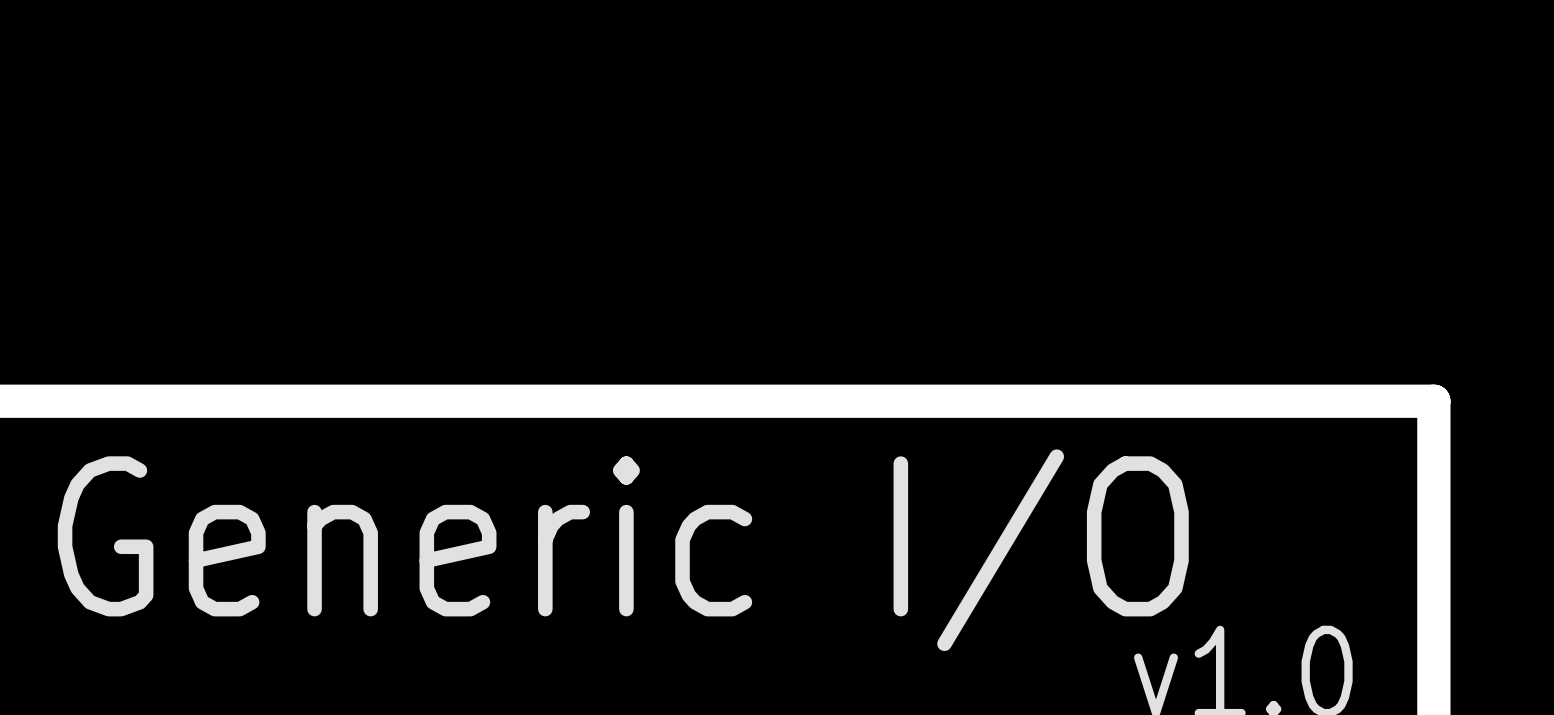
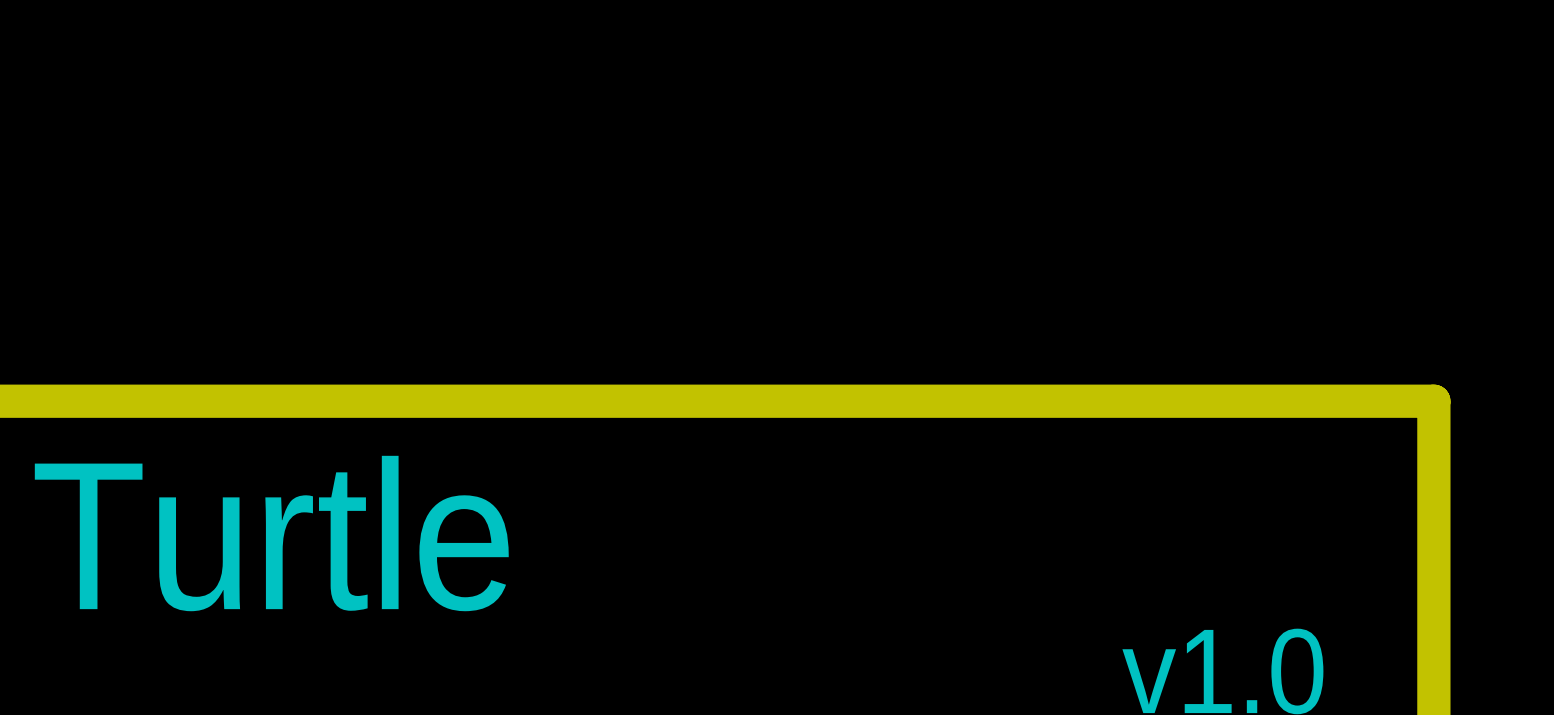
text: Generic I/O (623, 550) -> Turtle (271, 533)

